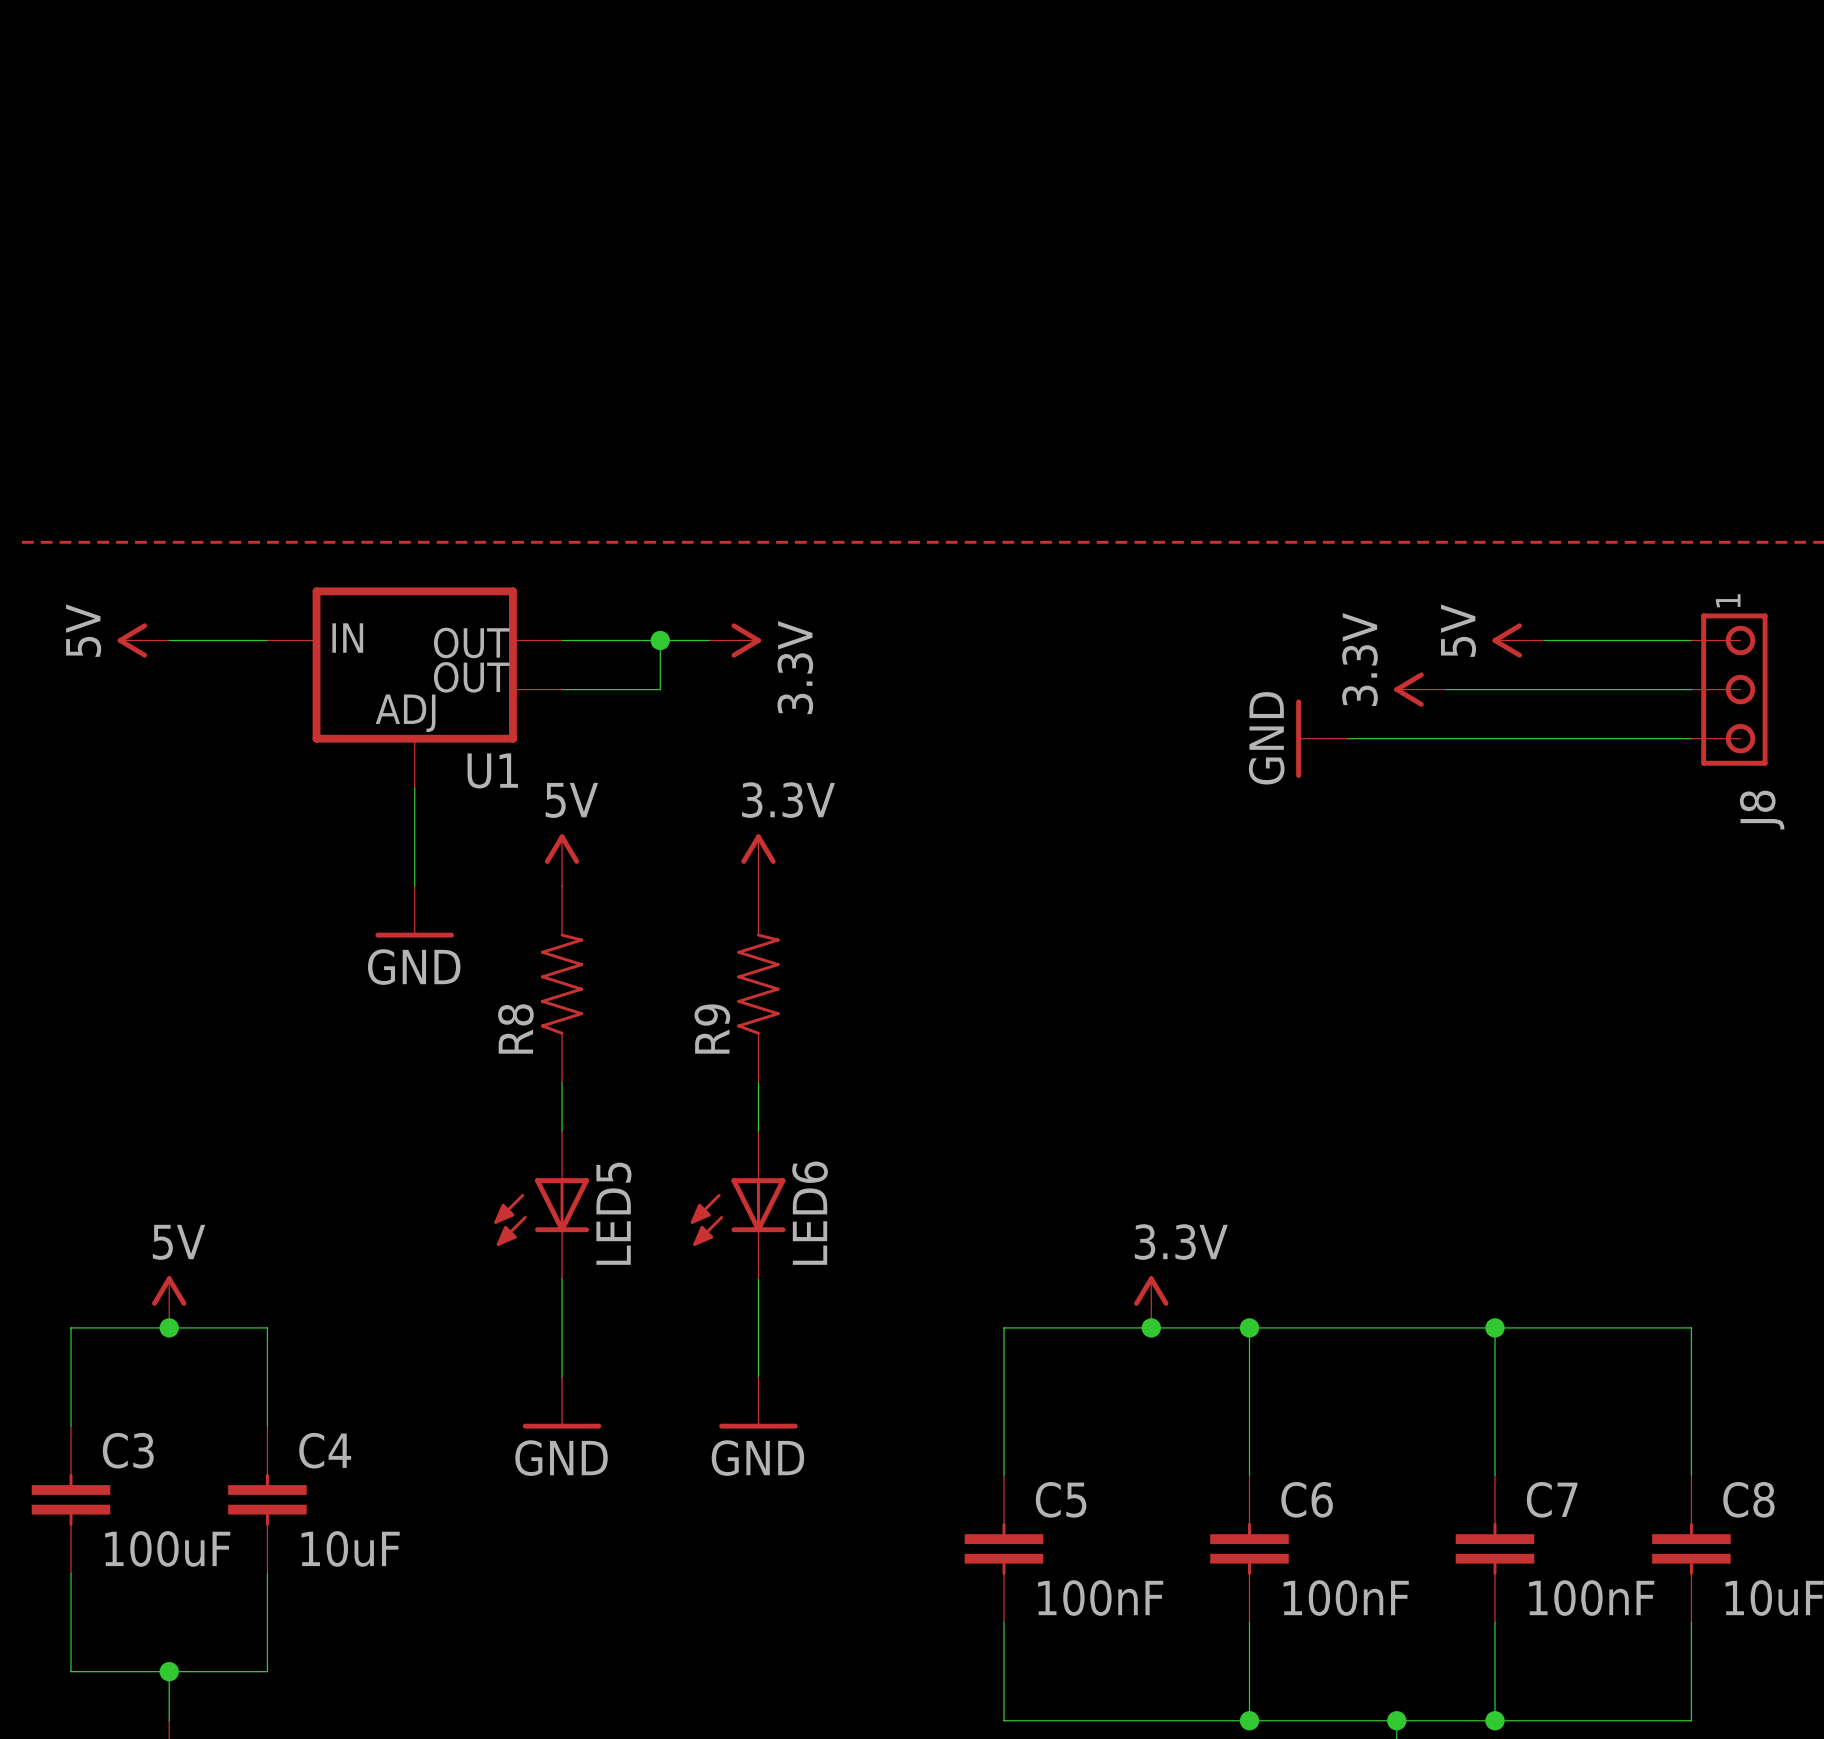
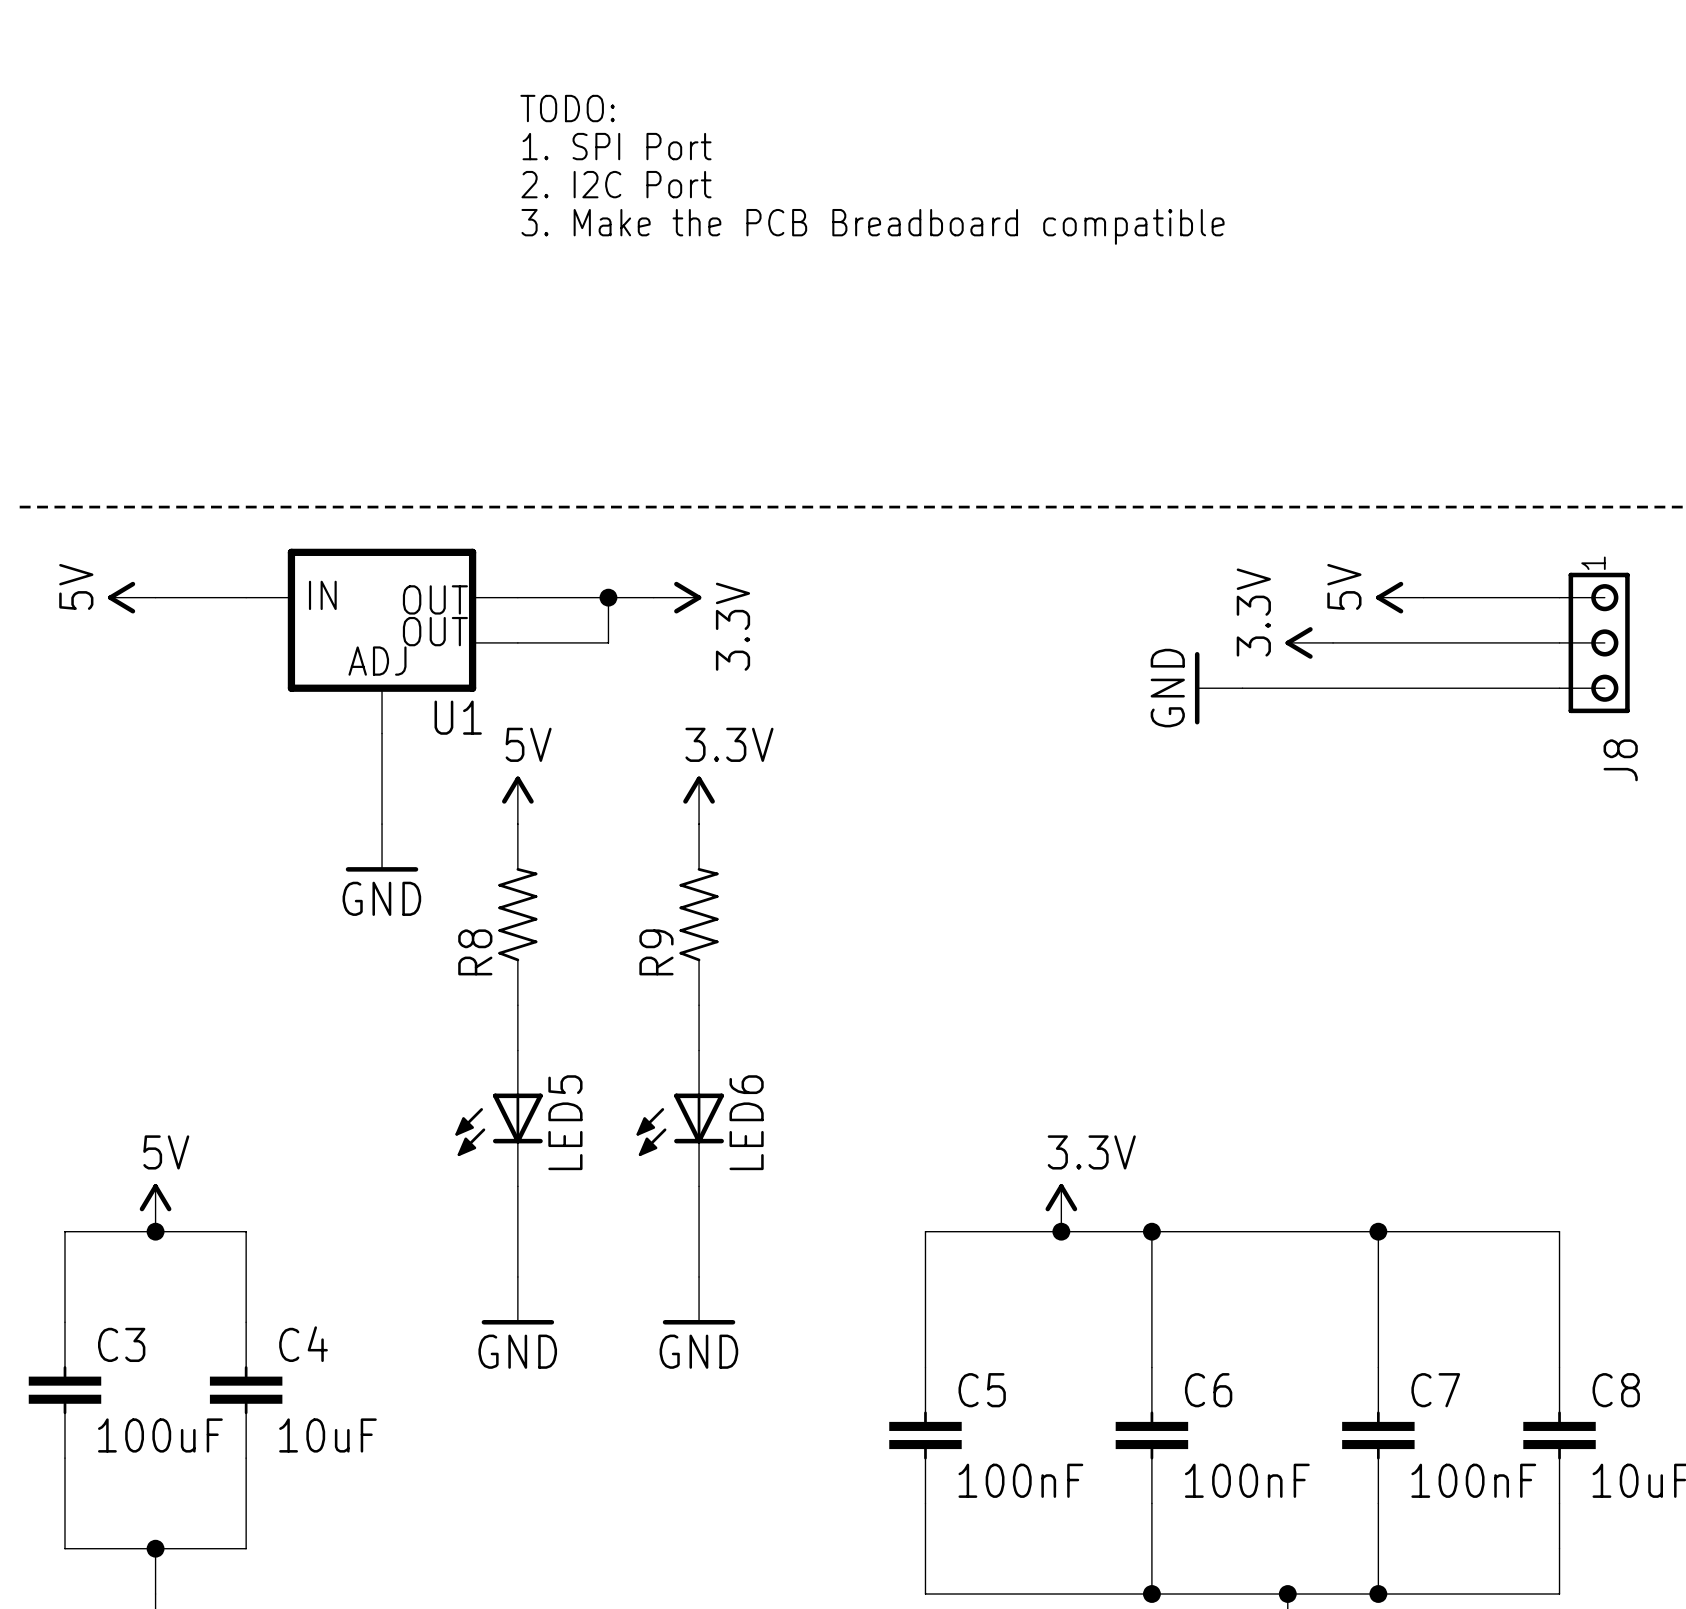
text: none -> TODO: (567, 108)
text: none -> 1. SPI Port (617, 146)
text: none -> 2. I2C Port (616, 184)
text: none -> 3. Make the PCB Breadboard compatible (873, 226)

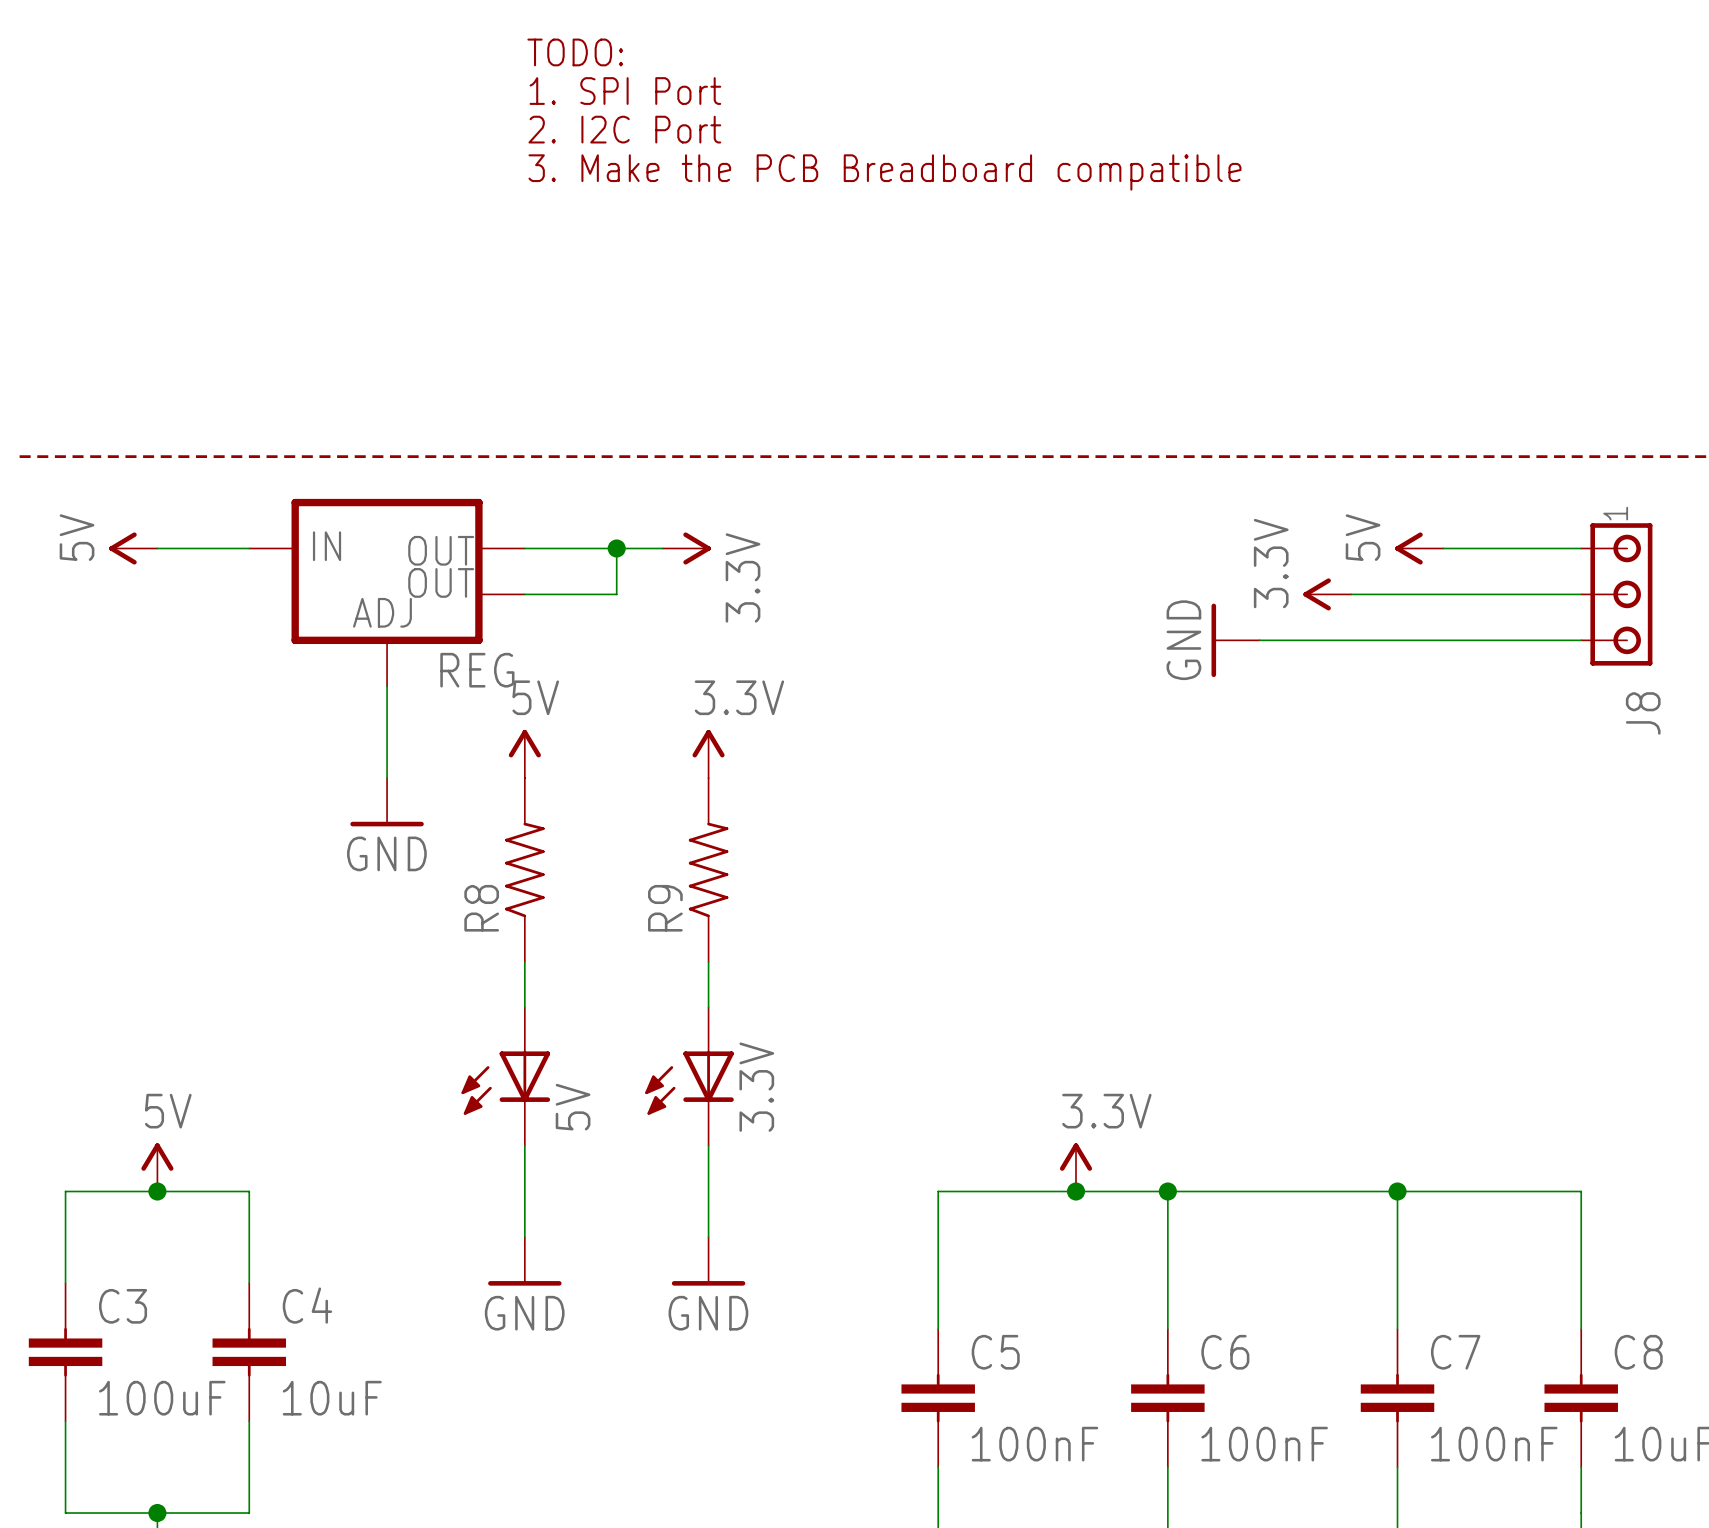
U1 name: U1 (458, 717) -> REG (477, 670)
LED5 name: LED5 (565, 1122) -> 5V (573, 1107)
LED6 name: LED6 (746, 1122) -> 3.3V (756, 1087)

